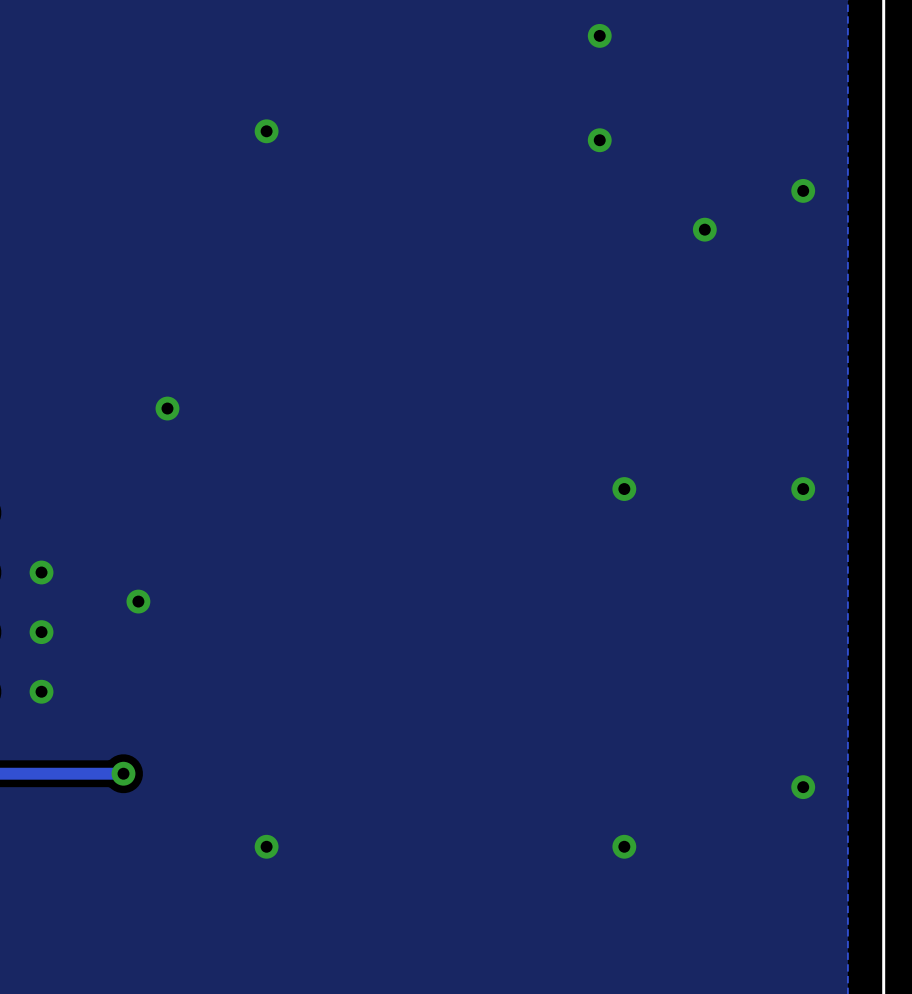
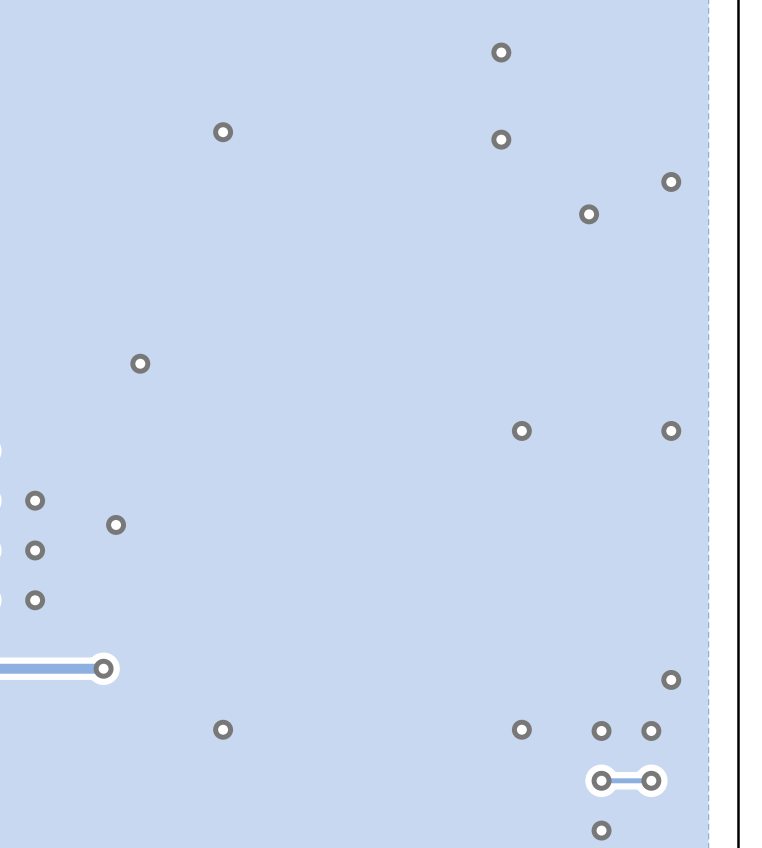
via: none -> (601, 730)
via: none -> (651, 730)
via: none -> (601, 780)
track: none -> (651, 780) (601, 780)
via: none -> (651, 780)
via: none -> (601, 830)

